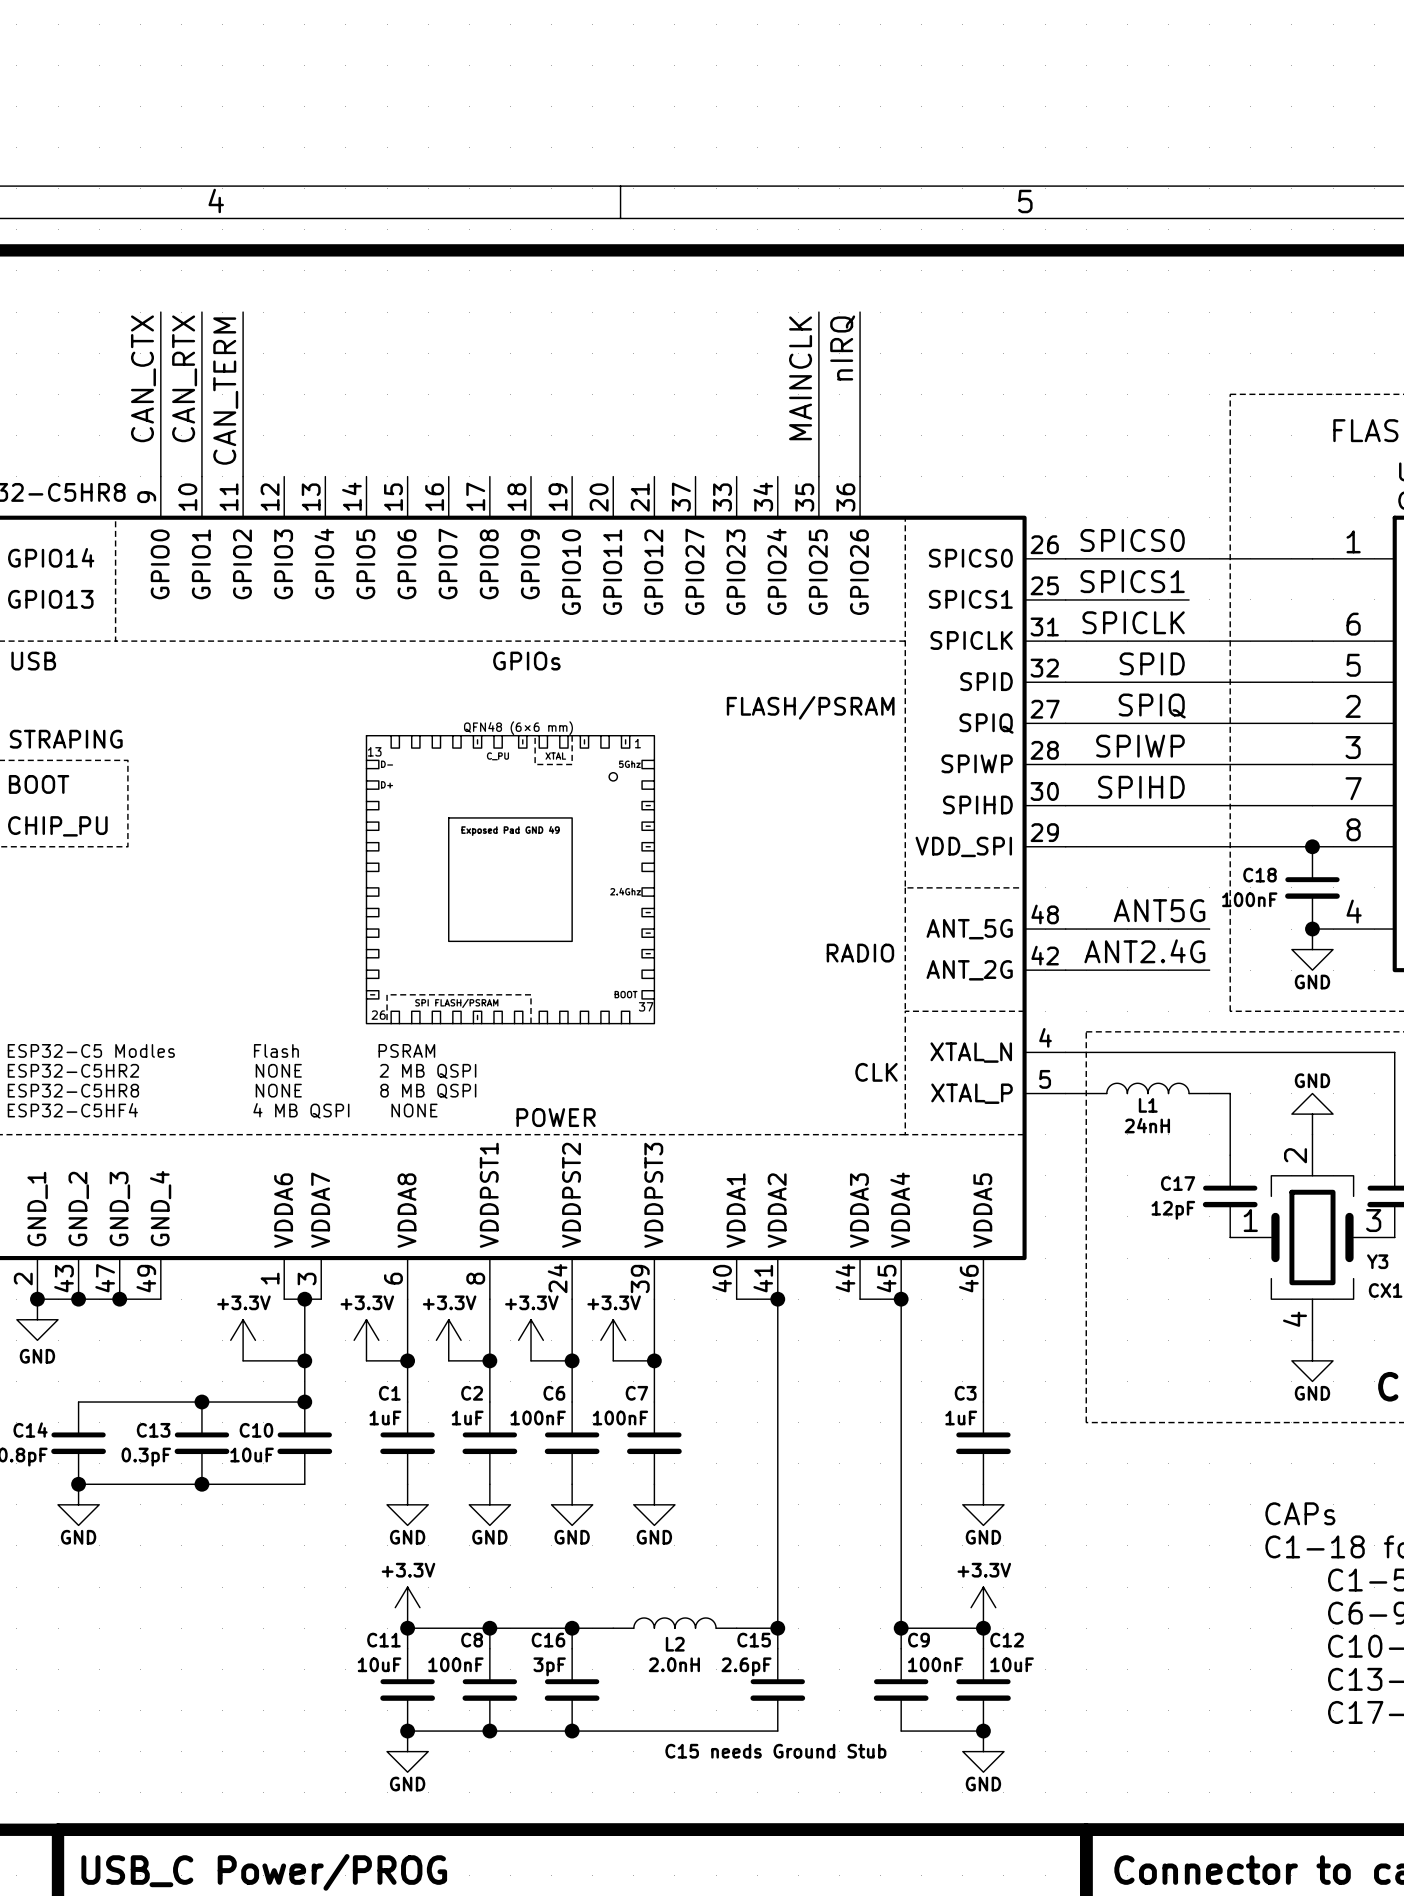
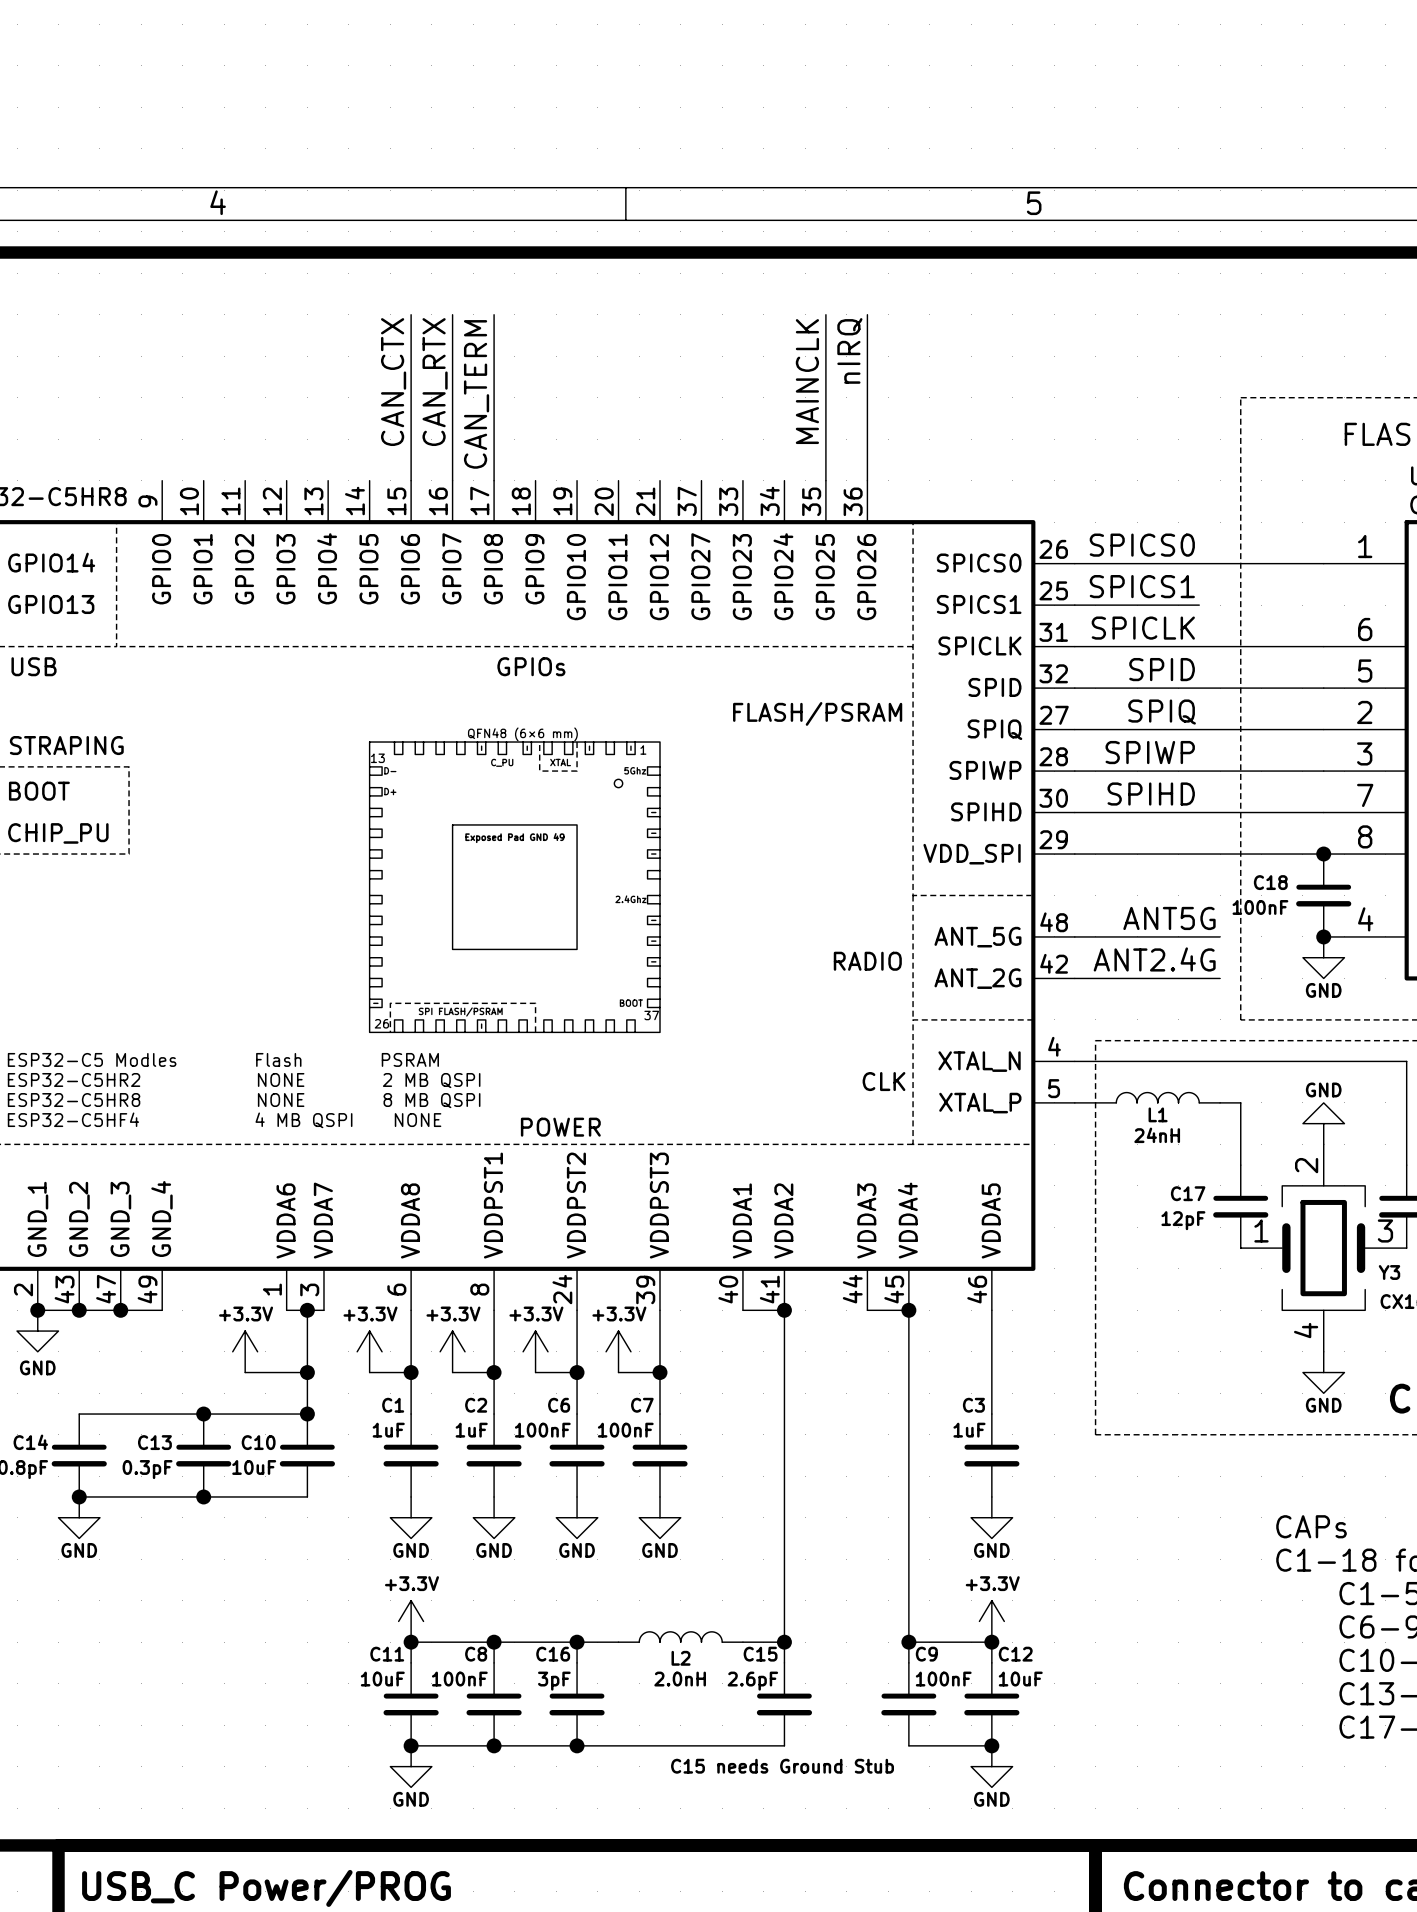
wire: (160, 312) (160, 476) -> (494, 314) (494, 480)
wire: (201, 312) (201, 476) -> (452, 314) (452, 480)
wire: (243, 312) (243, 476) -> (411, 314) (411, 480)
label position: CAN_CTX (143, 378) -> CAN_CTX (393, 382)
label position: CAN_RTX (184, 378) -> CAN_RTX (435, 382)
label position: CAN_TERM (225, 391) -> CAN_TERM (476, 394)

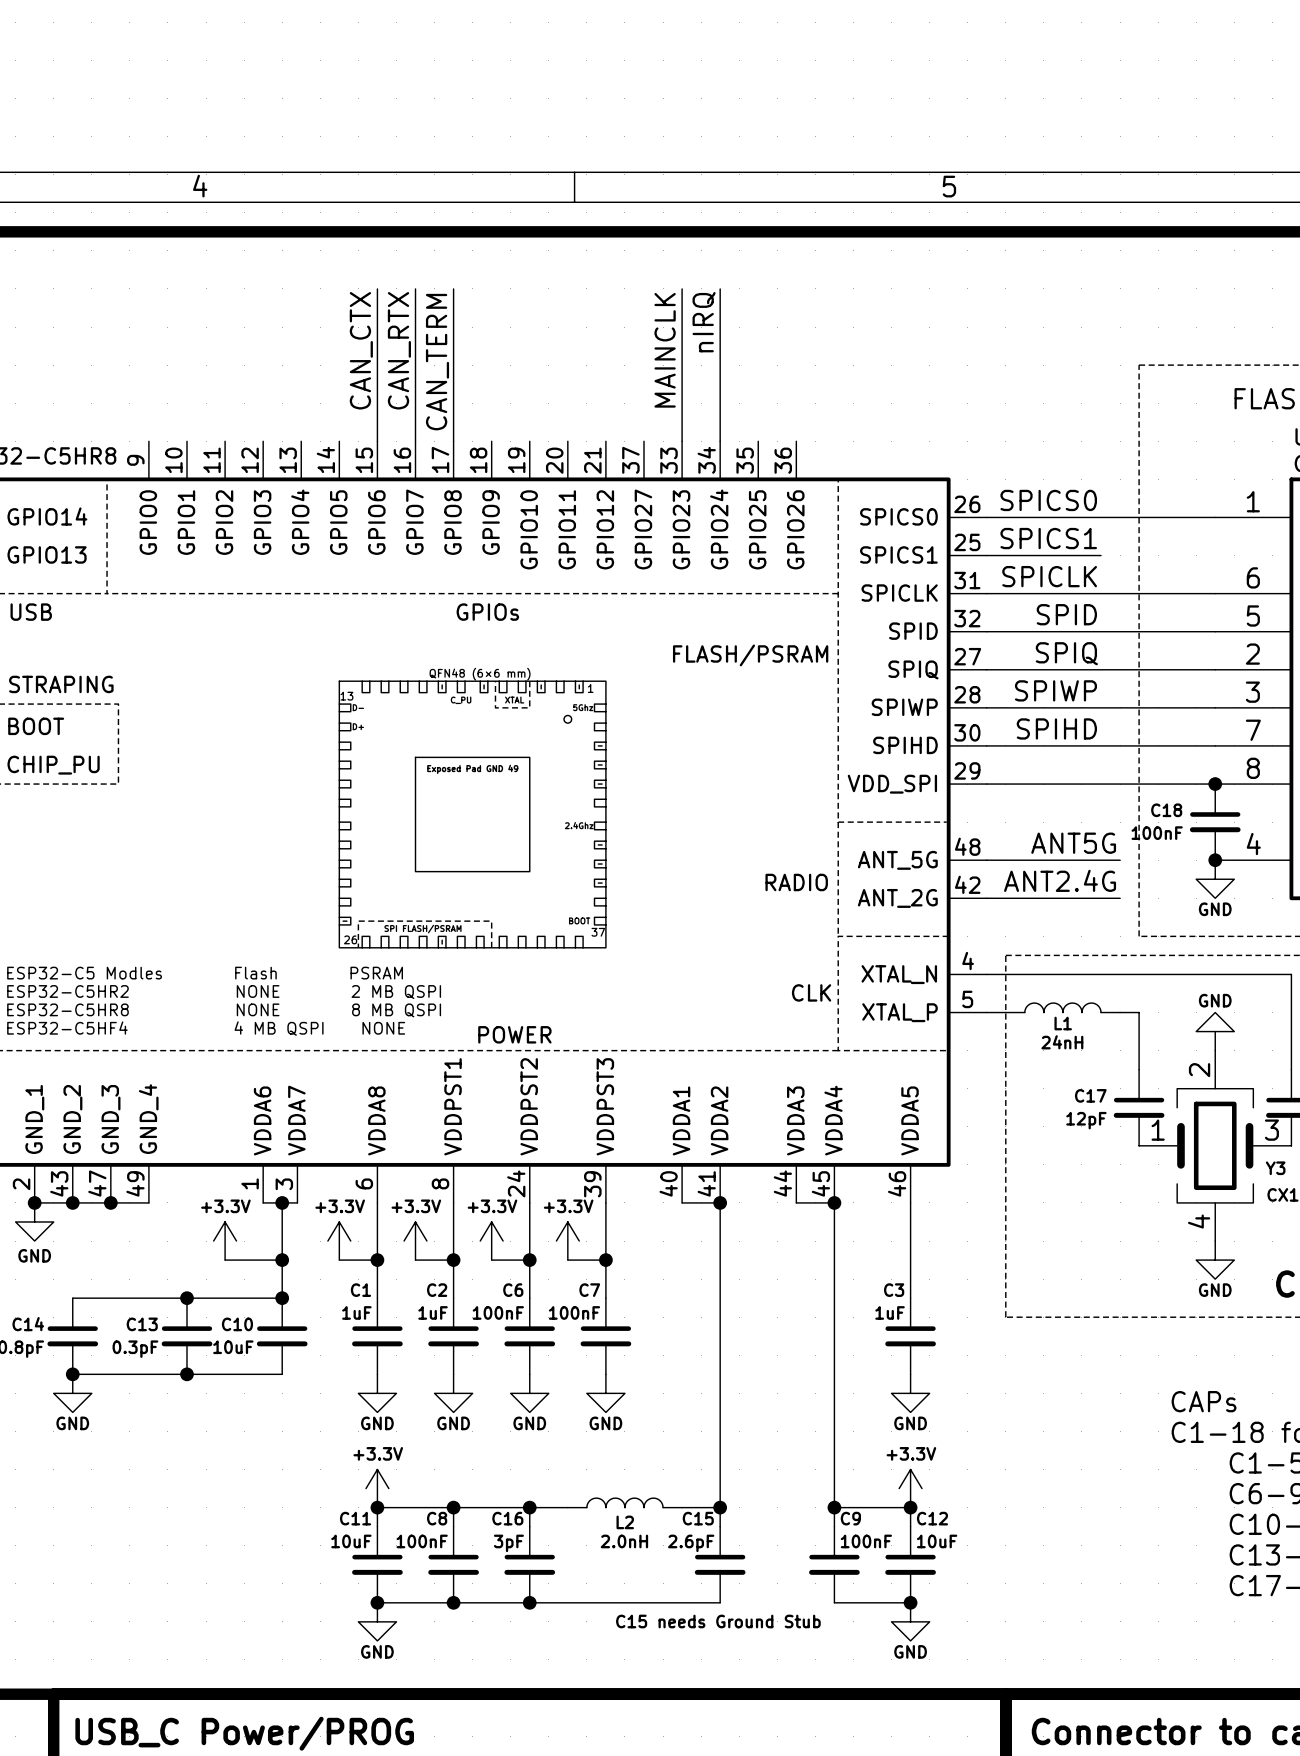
wire: (825, 314) (825, 480) -> (720, 288) (720, 441)
wire: (867, 314) (867, 480) -> (682, 288) (682, 441)
label position: nIRQ (849, 350) -> nIRQ (704, 322)
label position: MAINCLK (807, 381) -> MAINCLK (665, 350)

